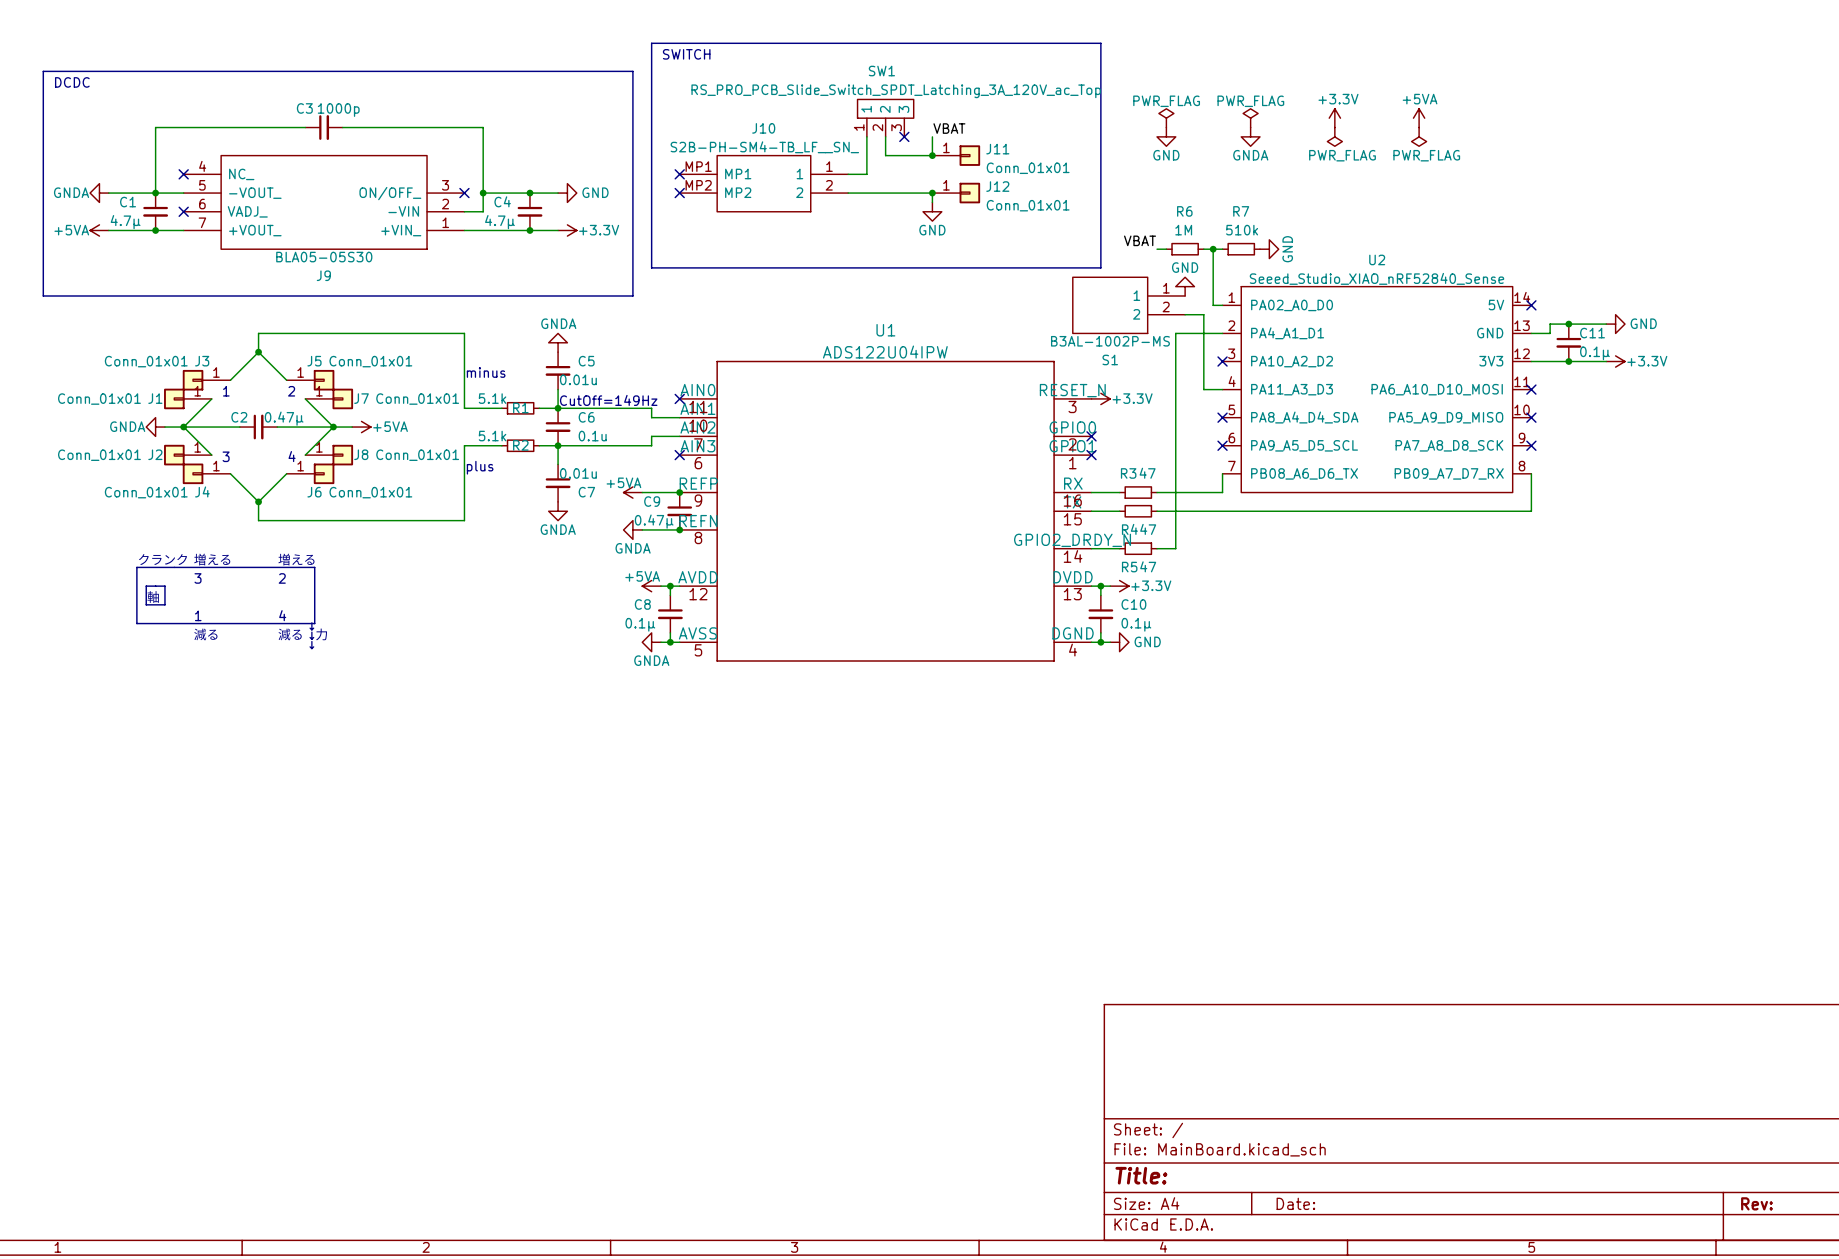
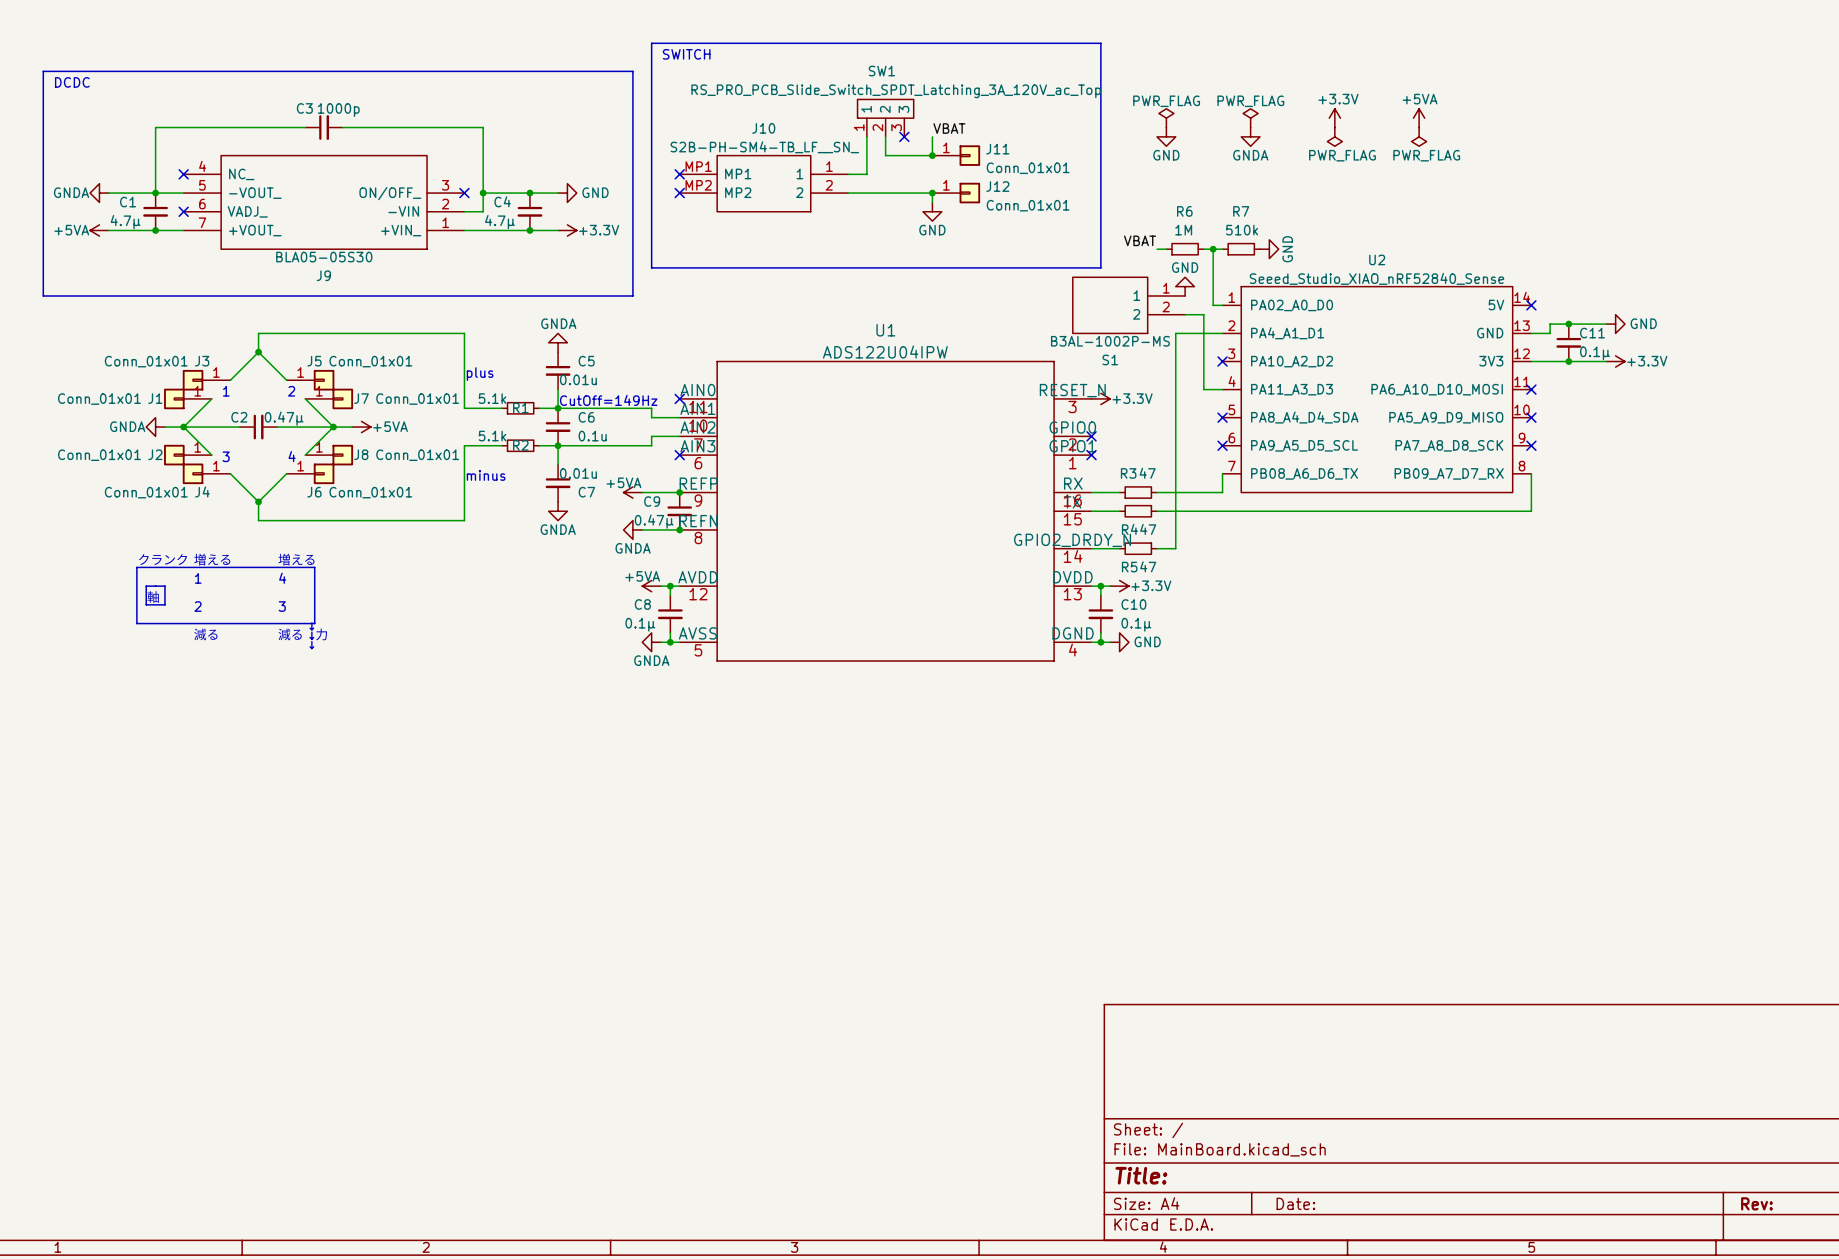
text: minus (486, 372) -> plus (480, 374)
text: plus (480, 467) -> none
text: none -> minus (486, 475)
text: 3 (198, 578) -> 1 (198, 578)
text: 2 (282, 578) -> 4 (282, 578)
text: none -> 2 (198, 606)
text: none -> 3 (282, 606)
text: 1 (198, 615) -> none
text: 4 (282, 615) -> none

